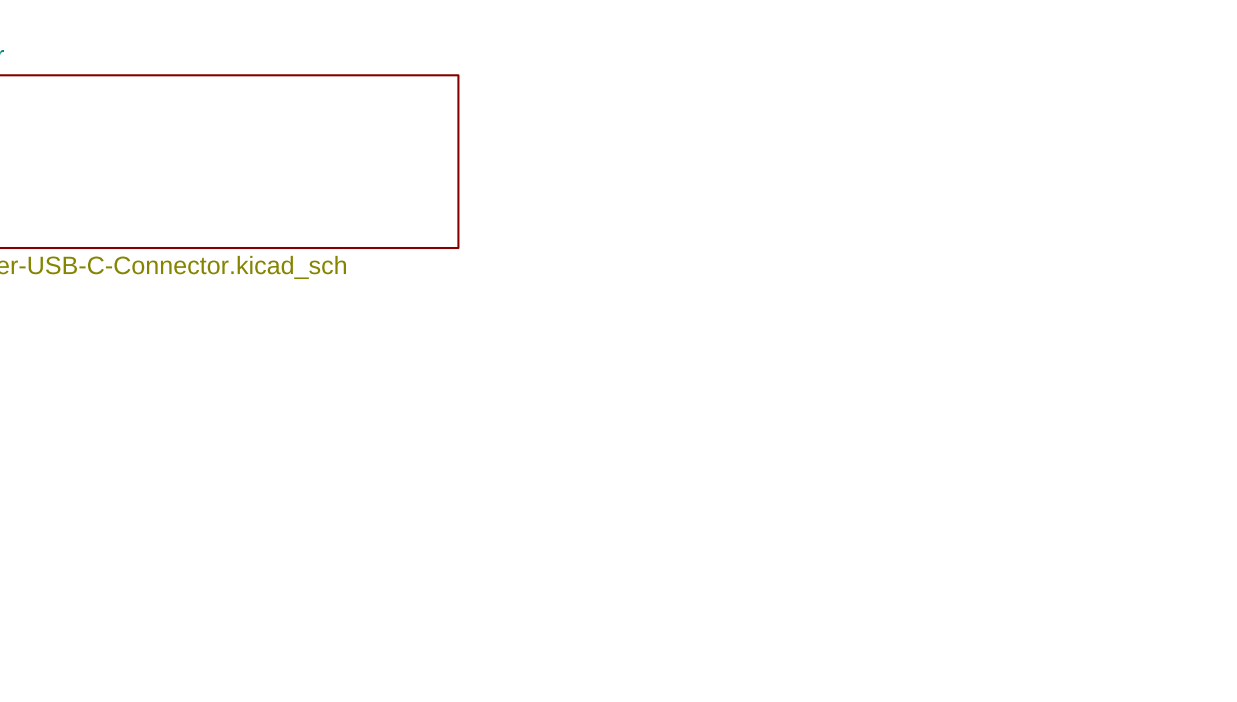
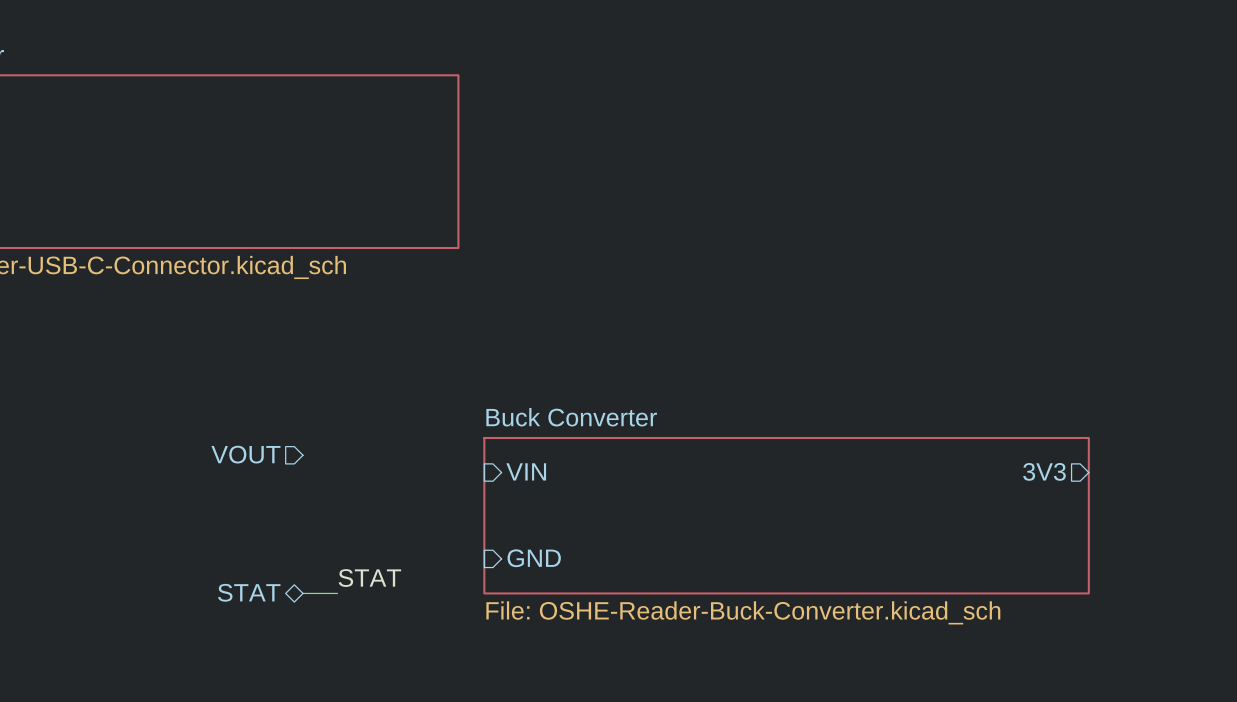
sheet pin: none -> VOUT (245, 454)
sheet pin: none -> VIN (526, 471)
sheet pin: none -> 3V3 (1044, 471)
sheet Buck Converter: none -> File: OSHE-Reader-Buck-Converter.kicad_sch (786, 515)
sheet pin: none -> GND (534, 558)
label: none -> STAT (369, 578)
sheet pin: none -> STAT (249, 592)
wire: none -> (302, 593) (337, 593)

